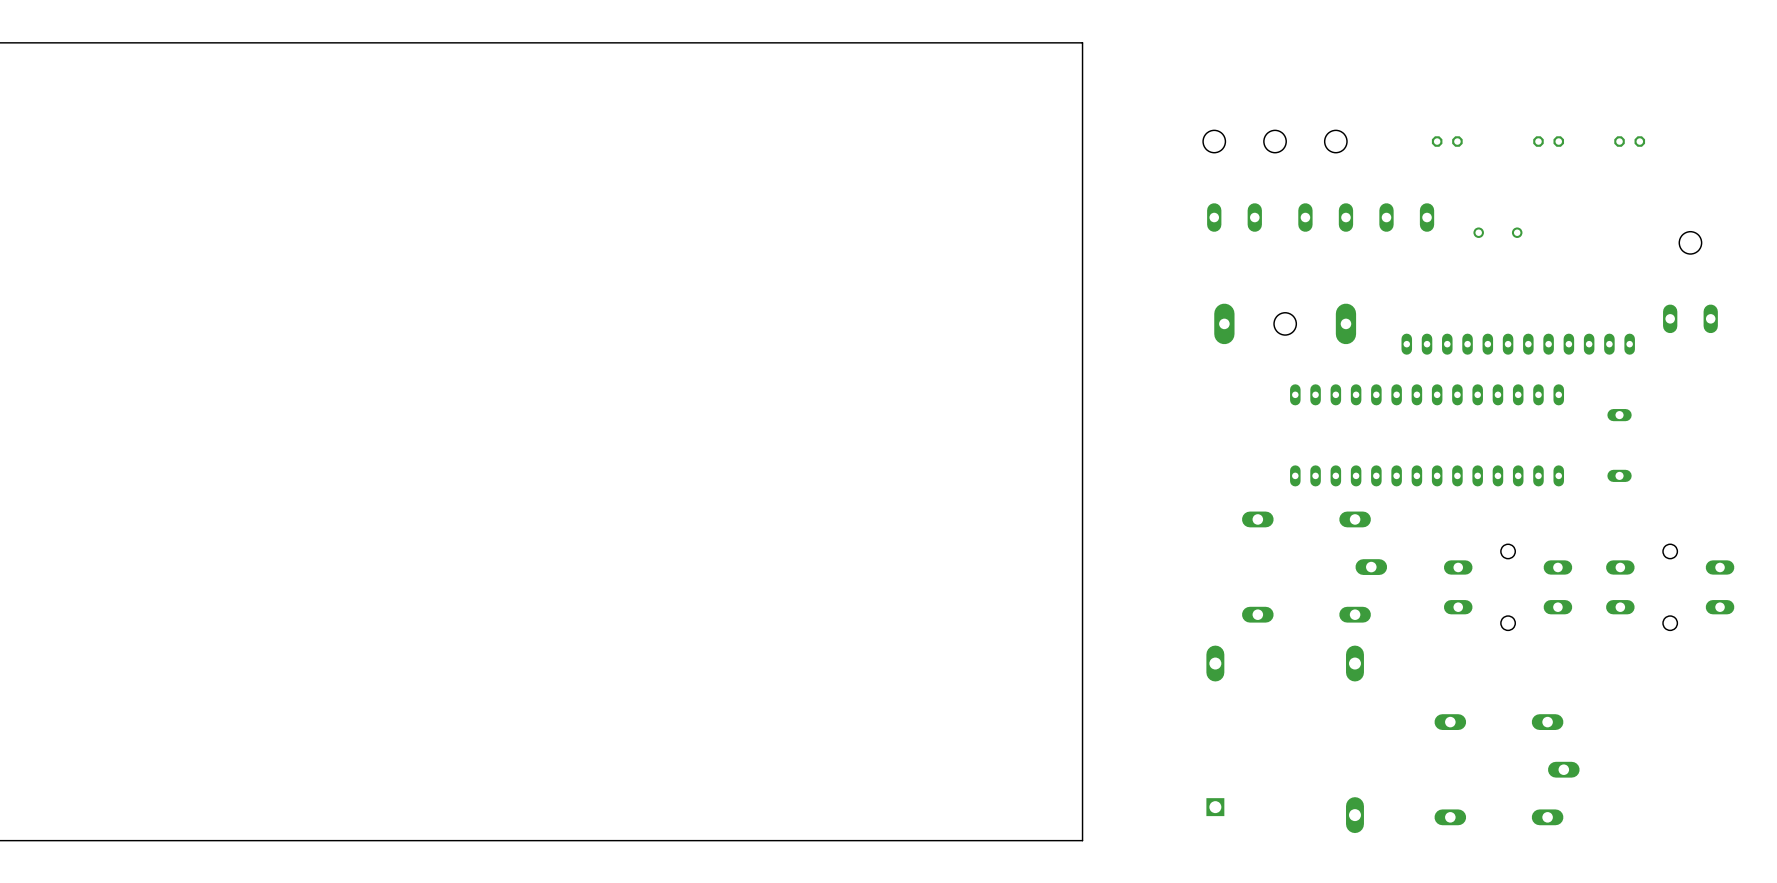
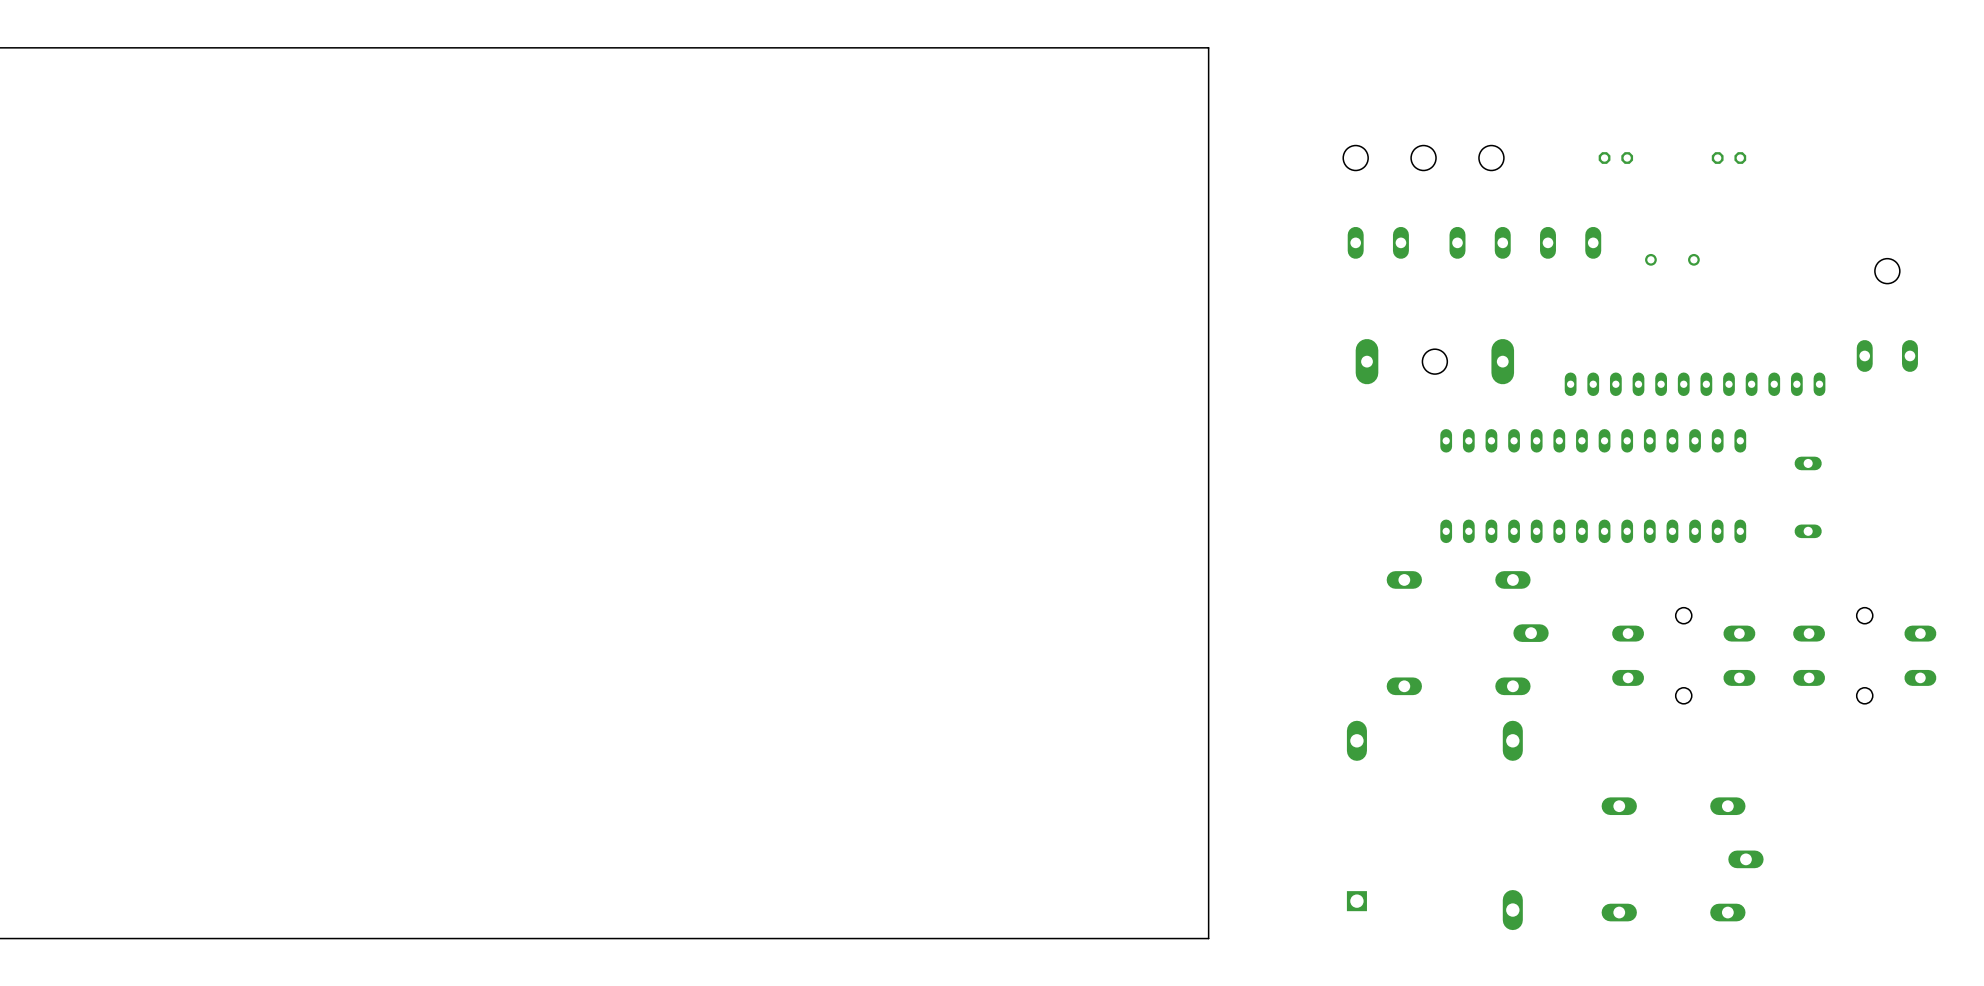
part: (1629, 141) -> none

